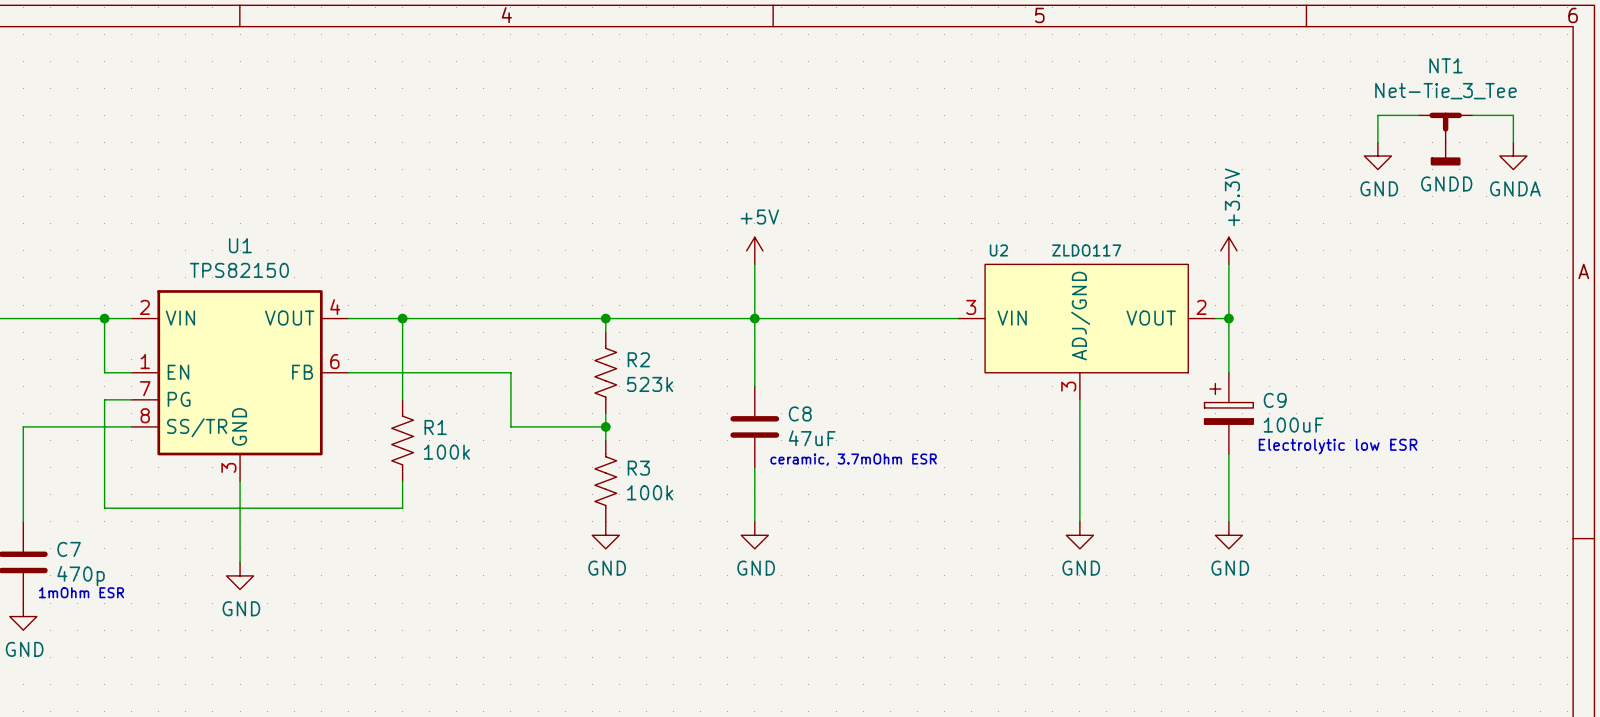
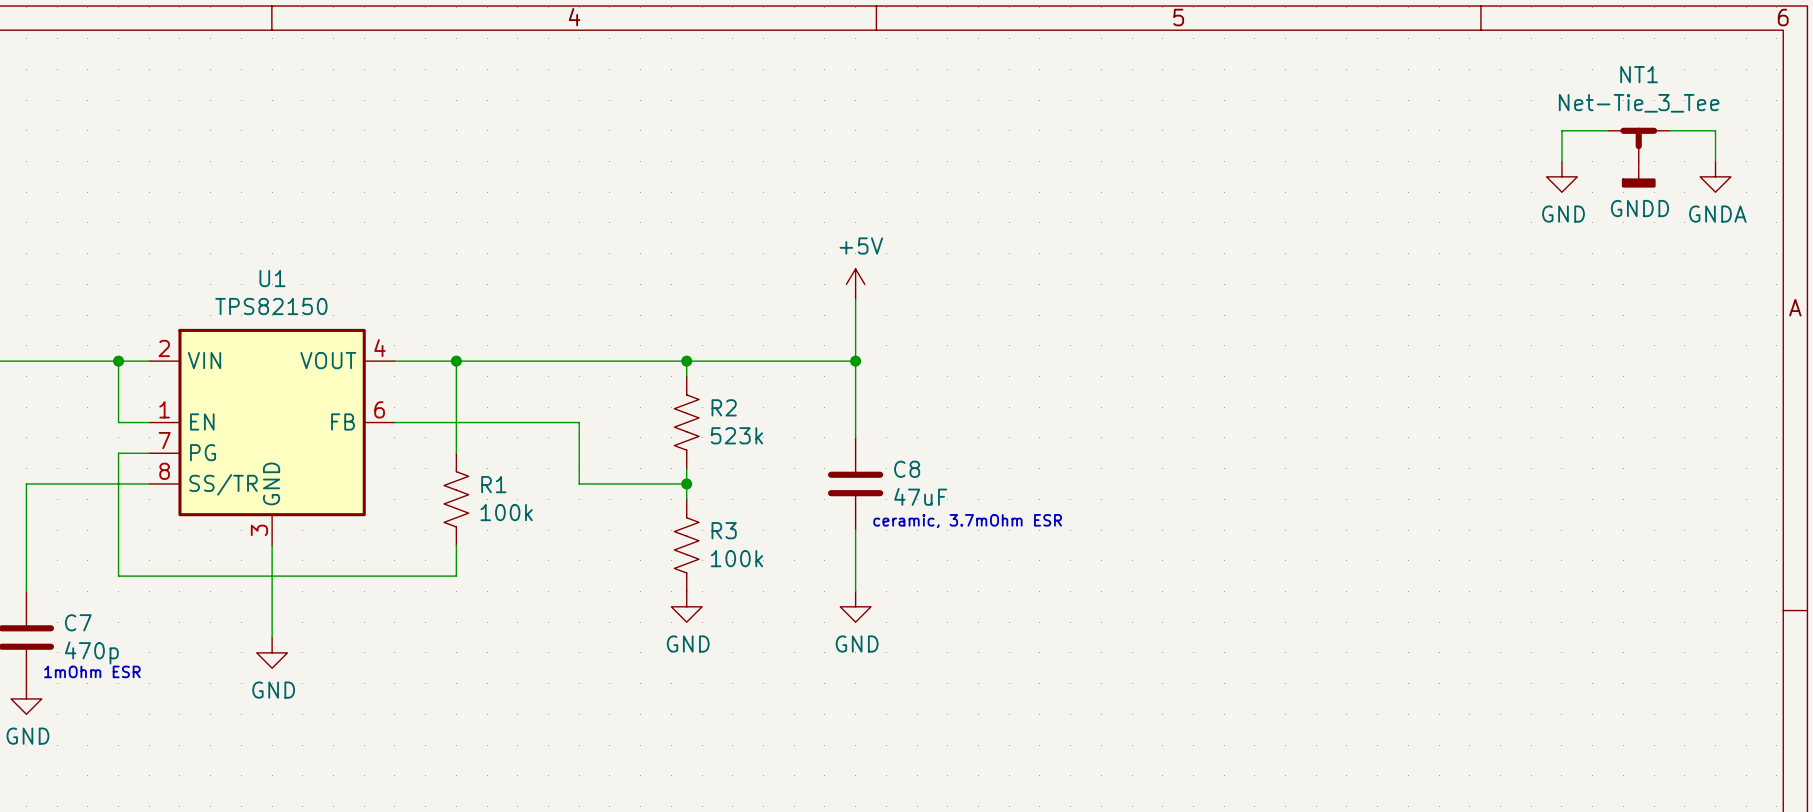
power symbol: +3.3V (1228, 250) -> none
wire: (1228, 264) (1228, 372) -> none
wire: (754, 318) (957, 318) -> none
wire: (1215, 318) (1228, 318) -> none
junction: (1228, 318) -> none
U2: ZLDO117 (1086, 332) -> none
wire: (1079, 399) (1079, 521) -> none
C9: 100uF (1228, 413) -> none
text: Electrolytic low ESR (1338, 446) -> none
wire: (1228, 454) (1228, 521) -> none
power symbol: GND (1079, 535) -> none
power symbol: GND (1228, 535) -> none

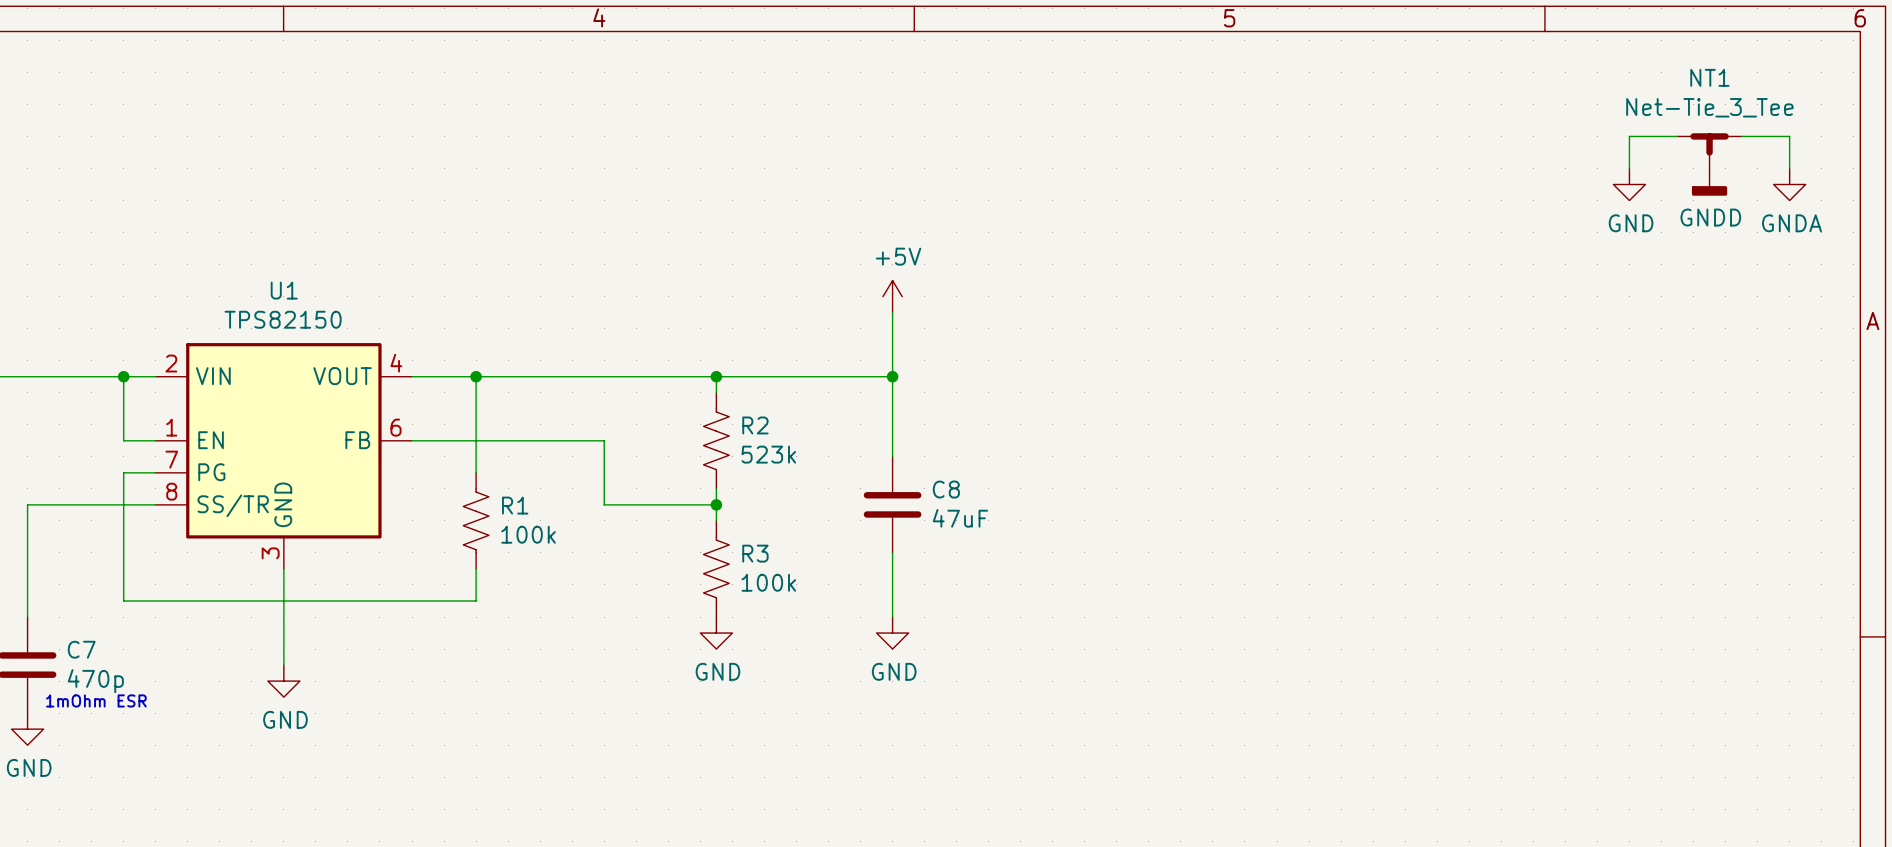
text: ceramic, 3.7mOhm ESR (967, 521) -> none

